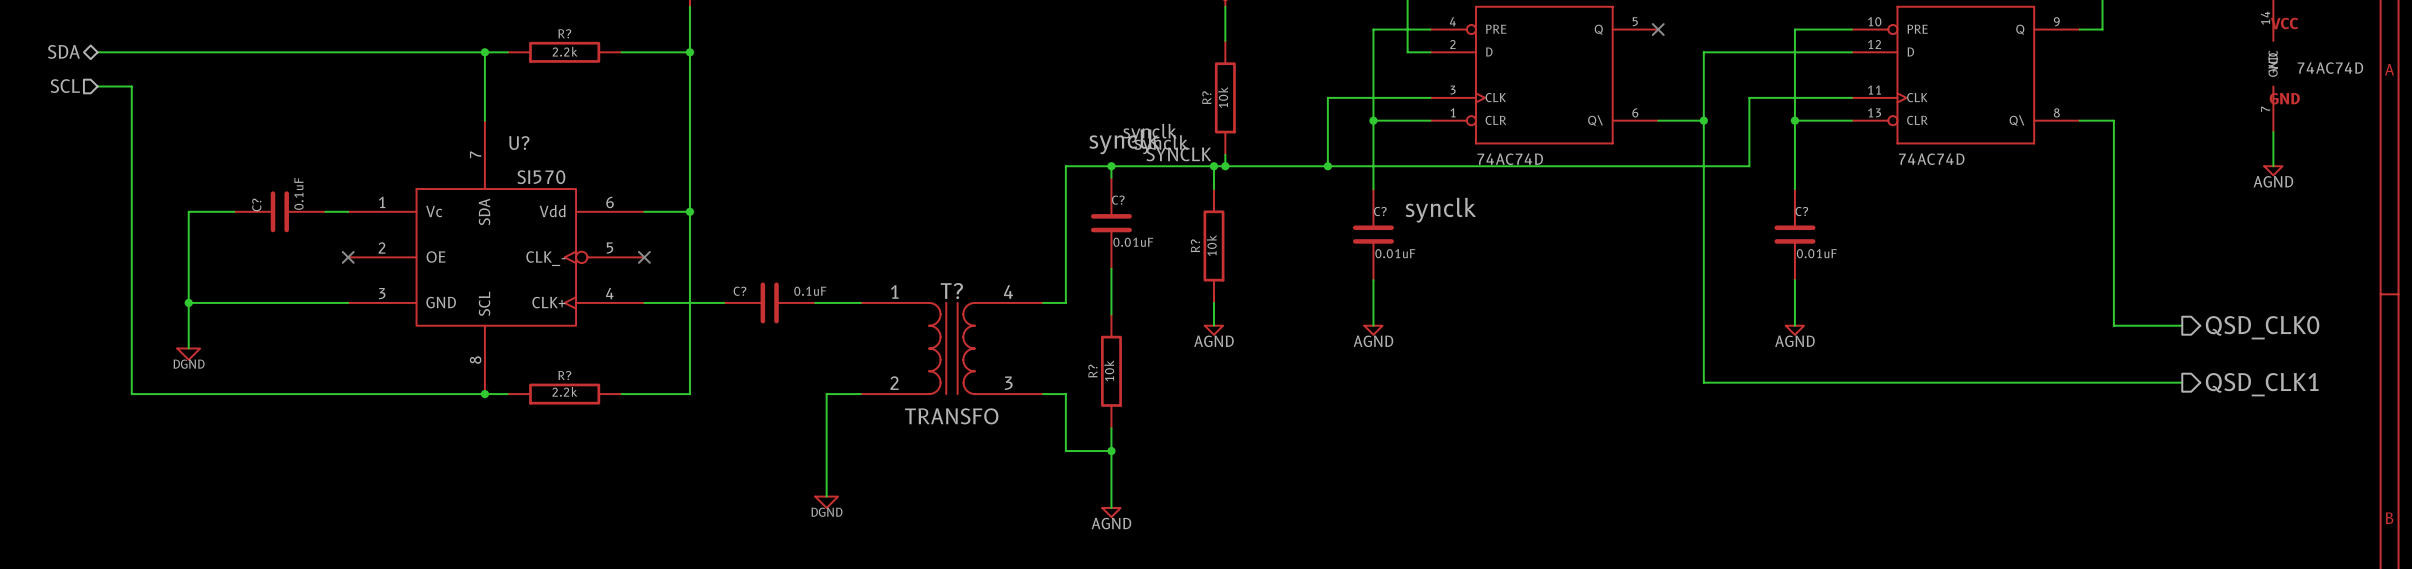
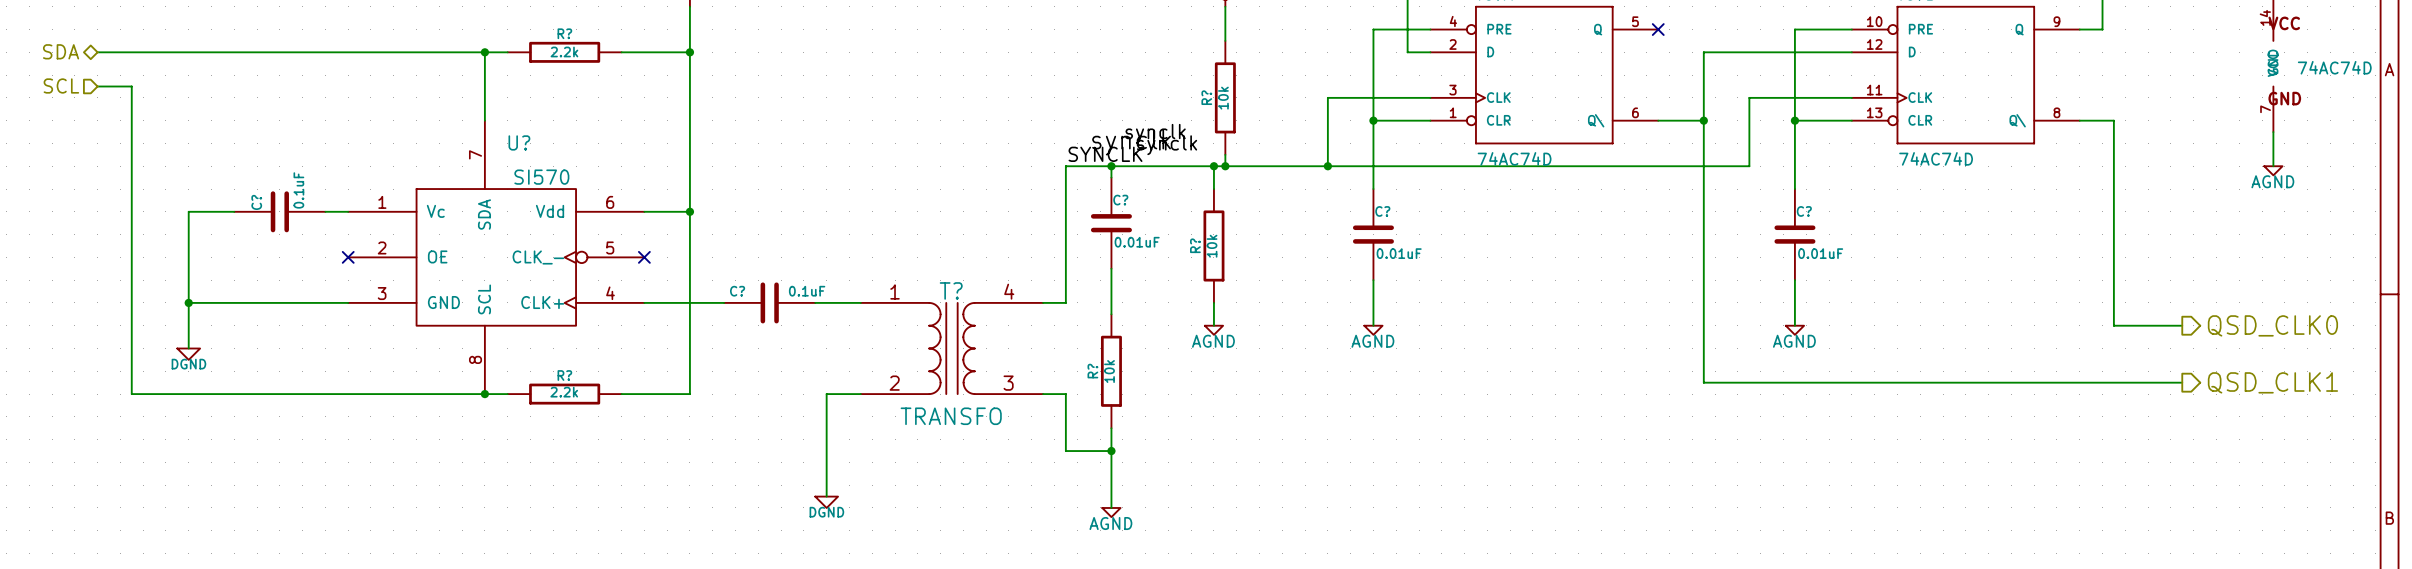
label position: SYNCLK (1178, 154) -> SYNCLK (1105, 154)
label: synclk (1440, 210) -> none

